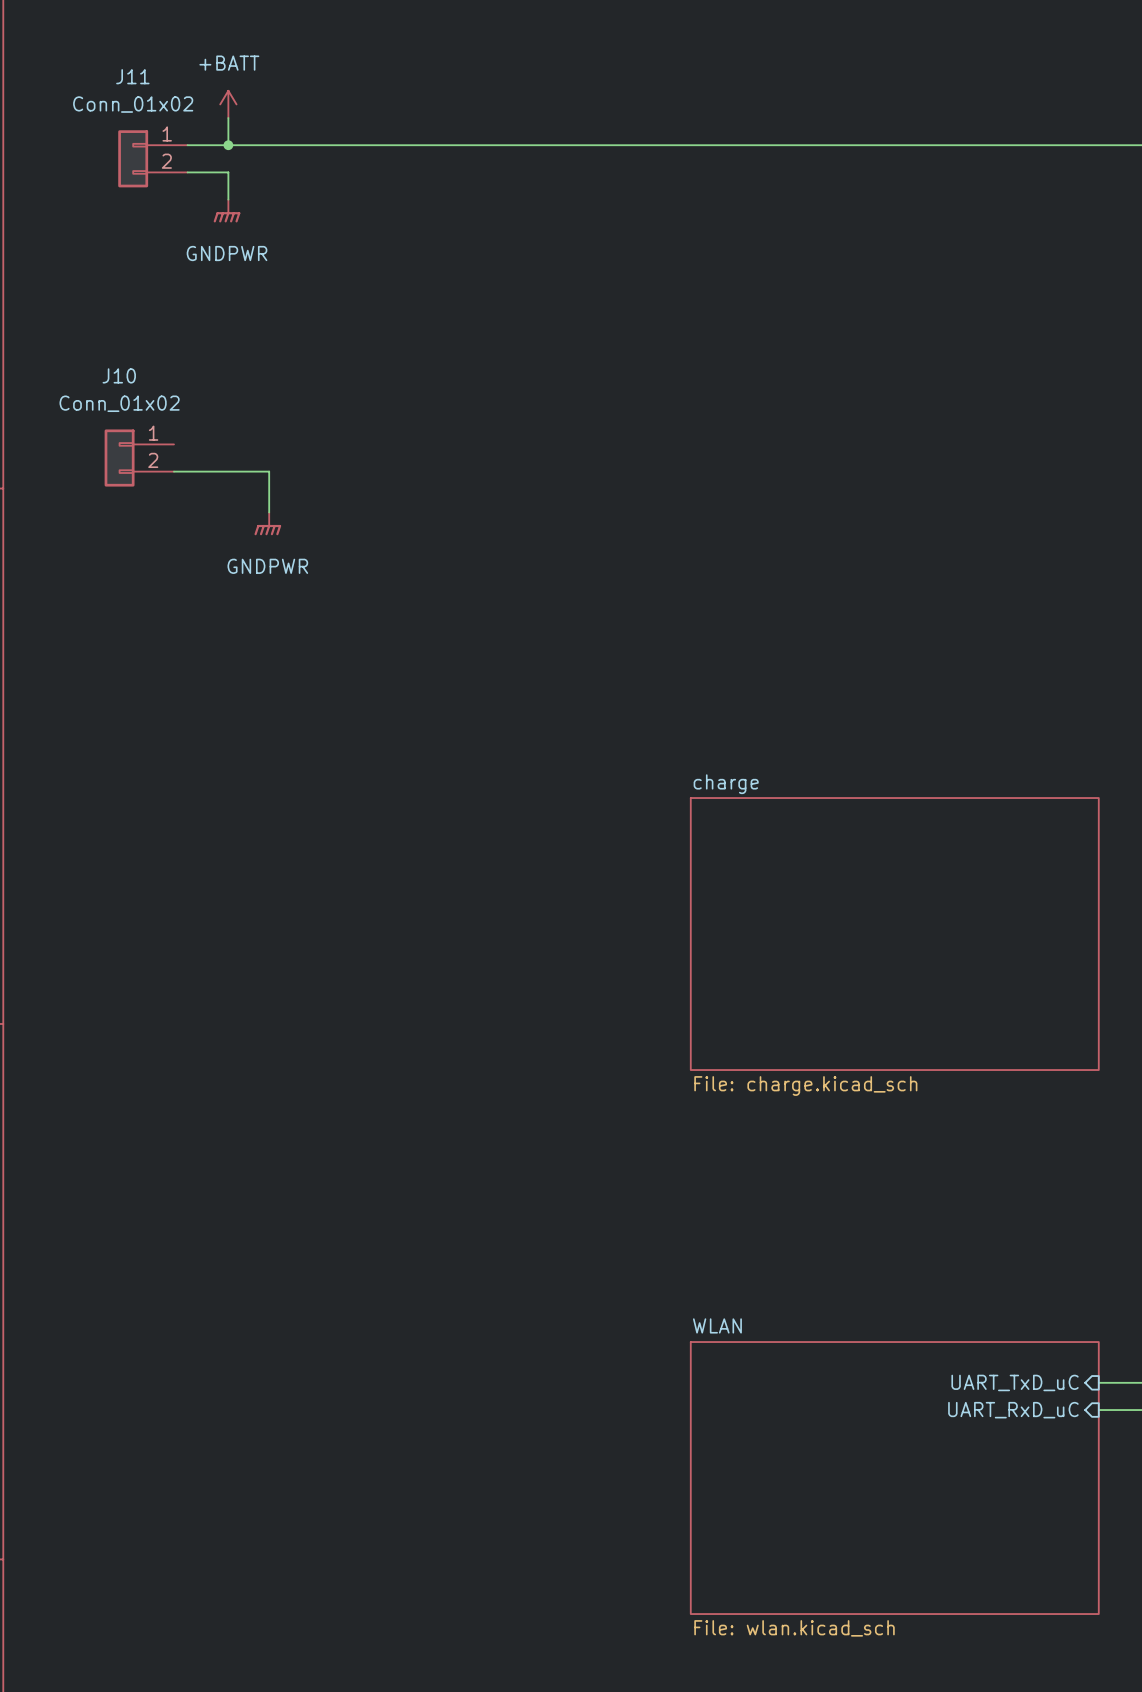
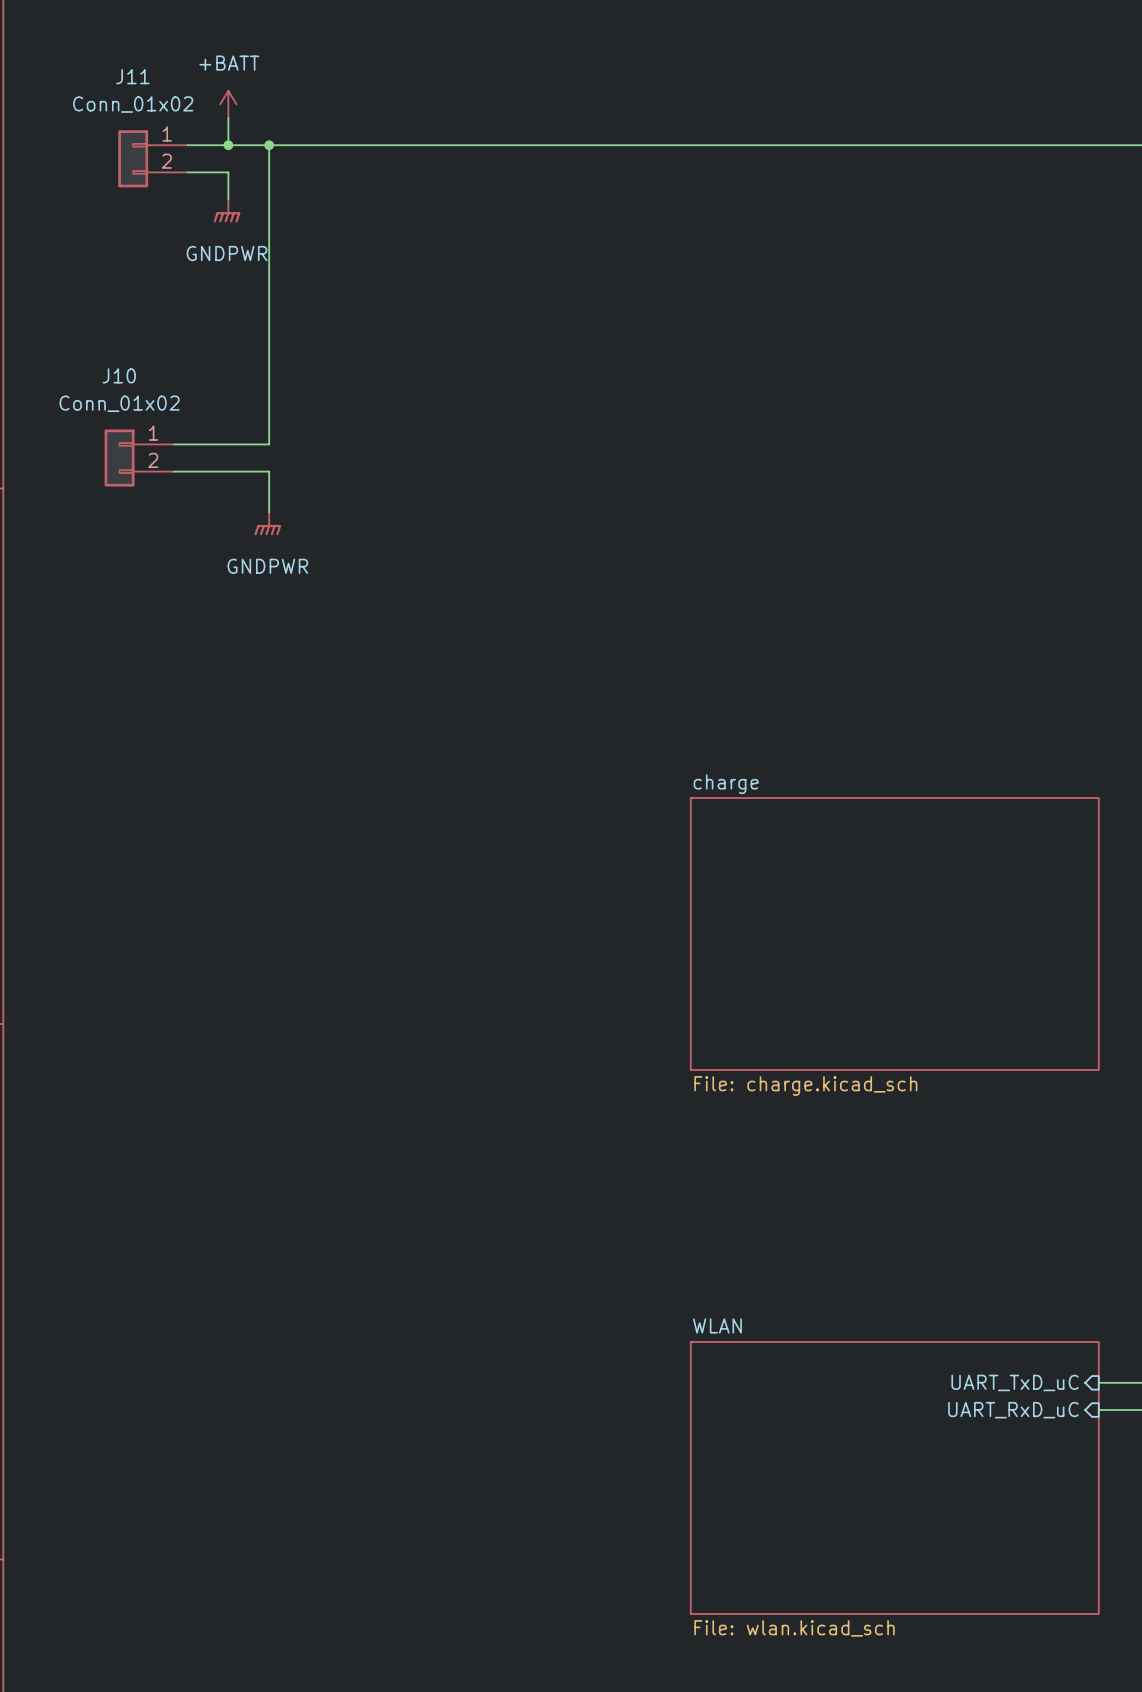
wire: none -> (269, 145) (269, 444) (173, 444)
junction: none -> (269, 145)

